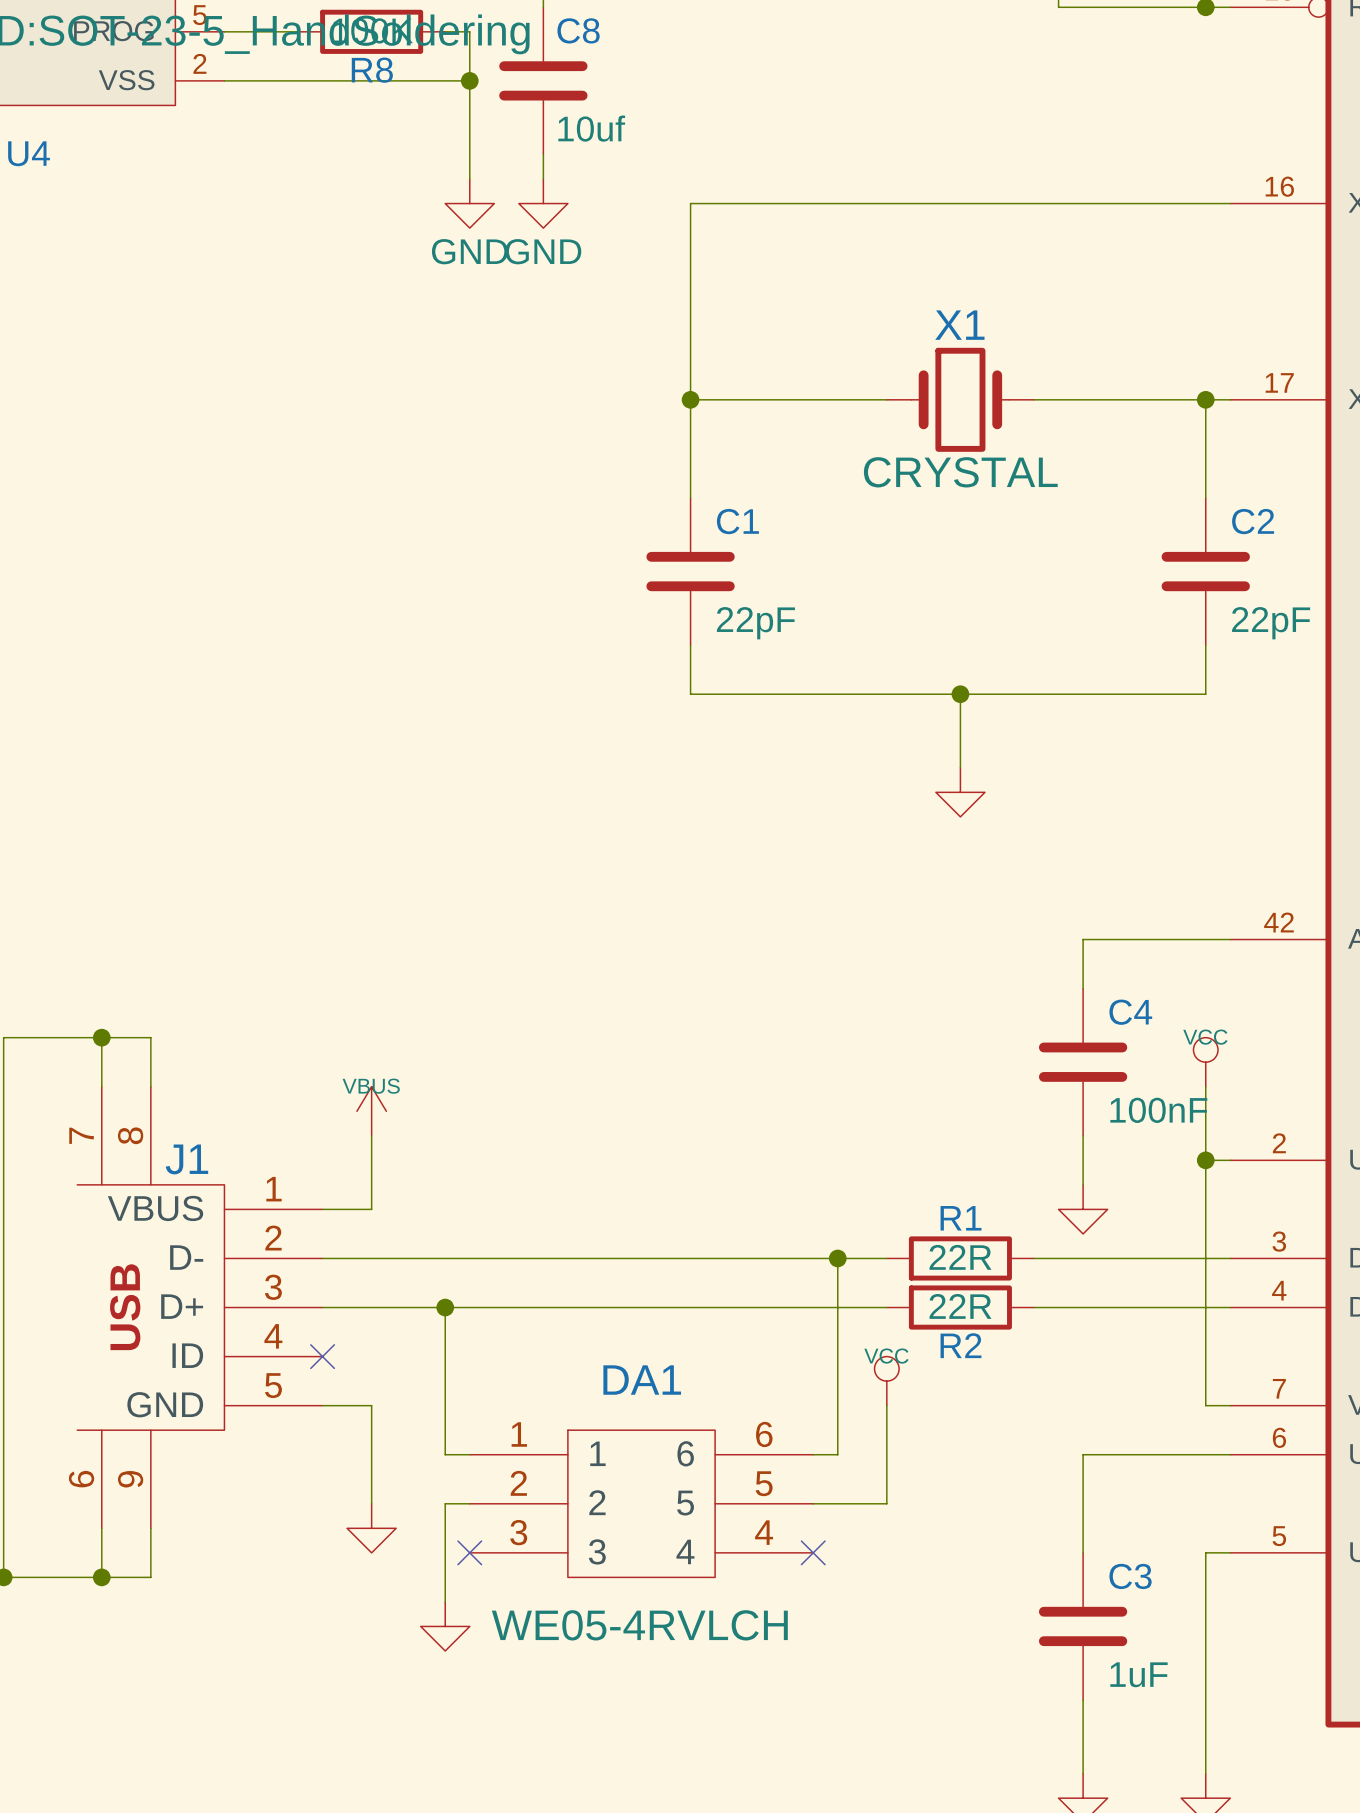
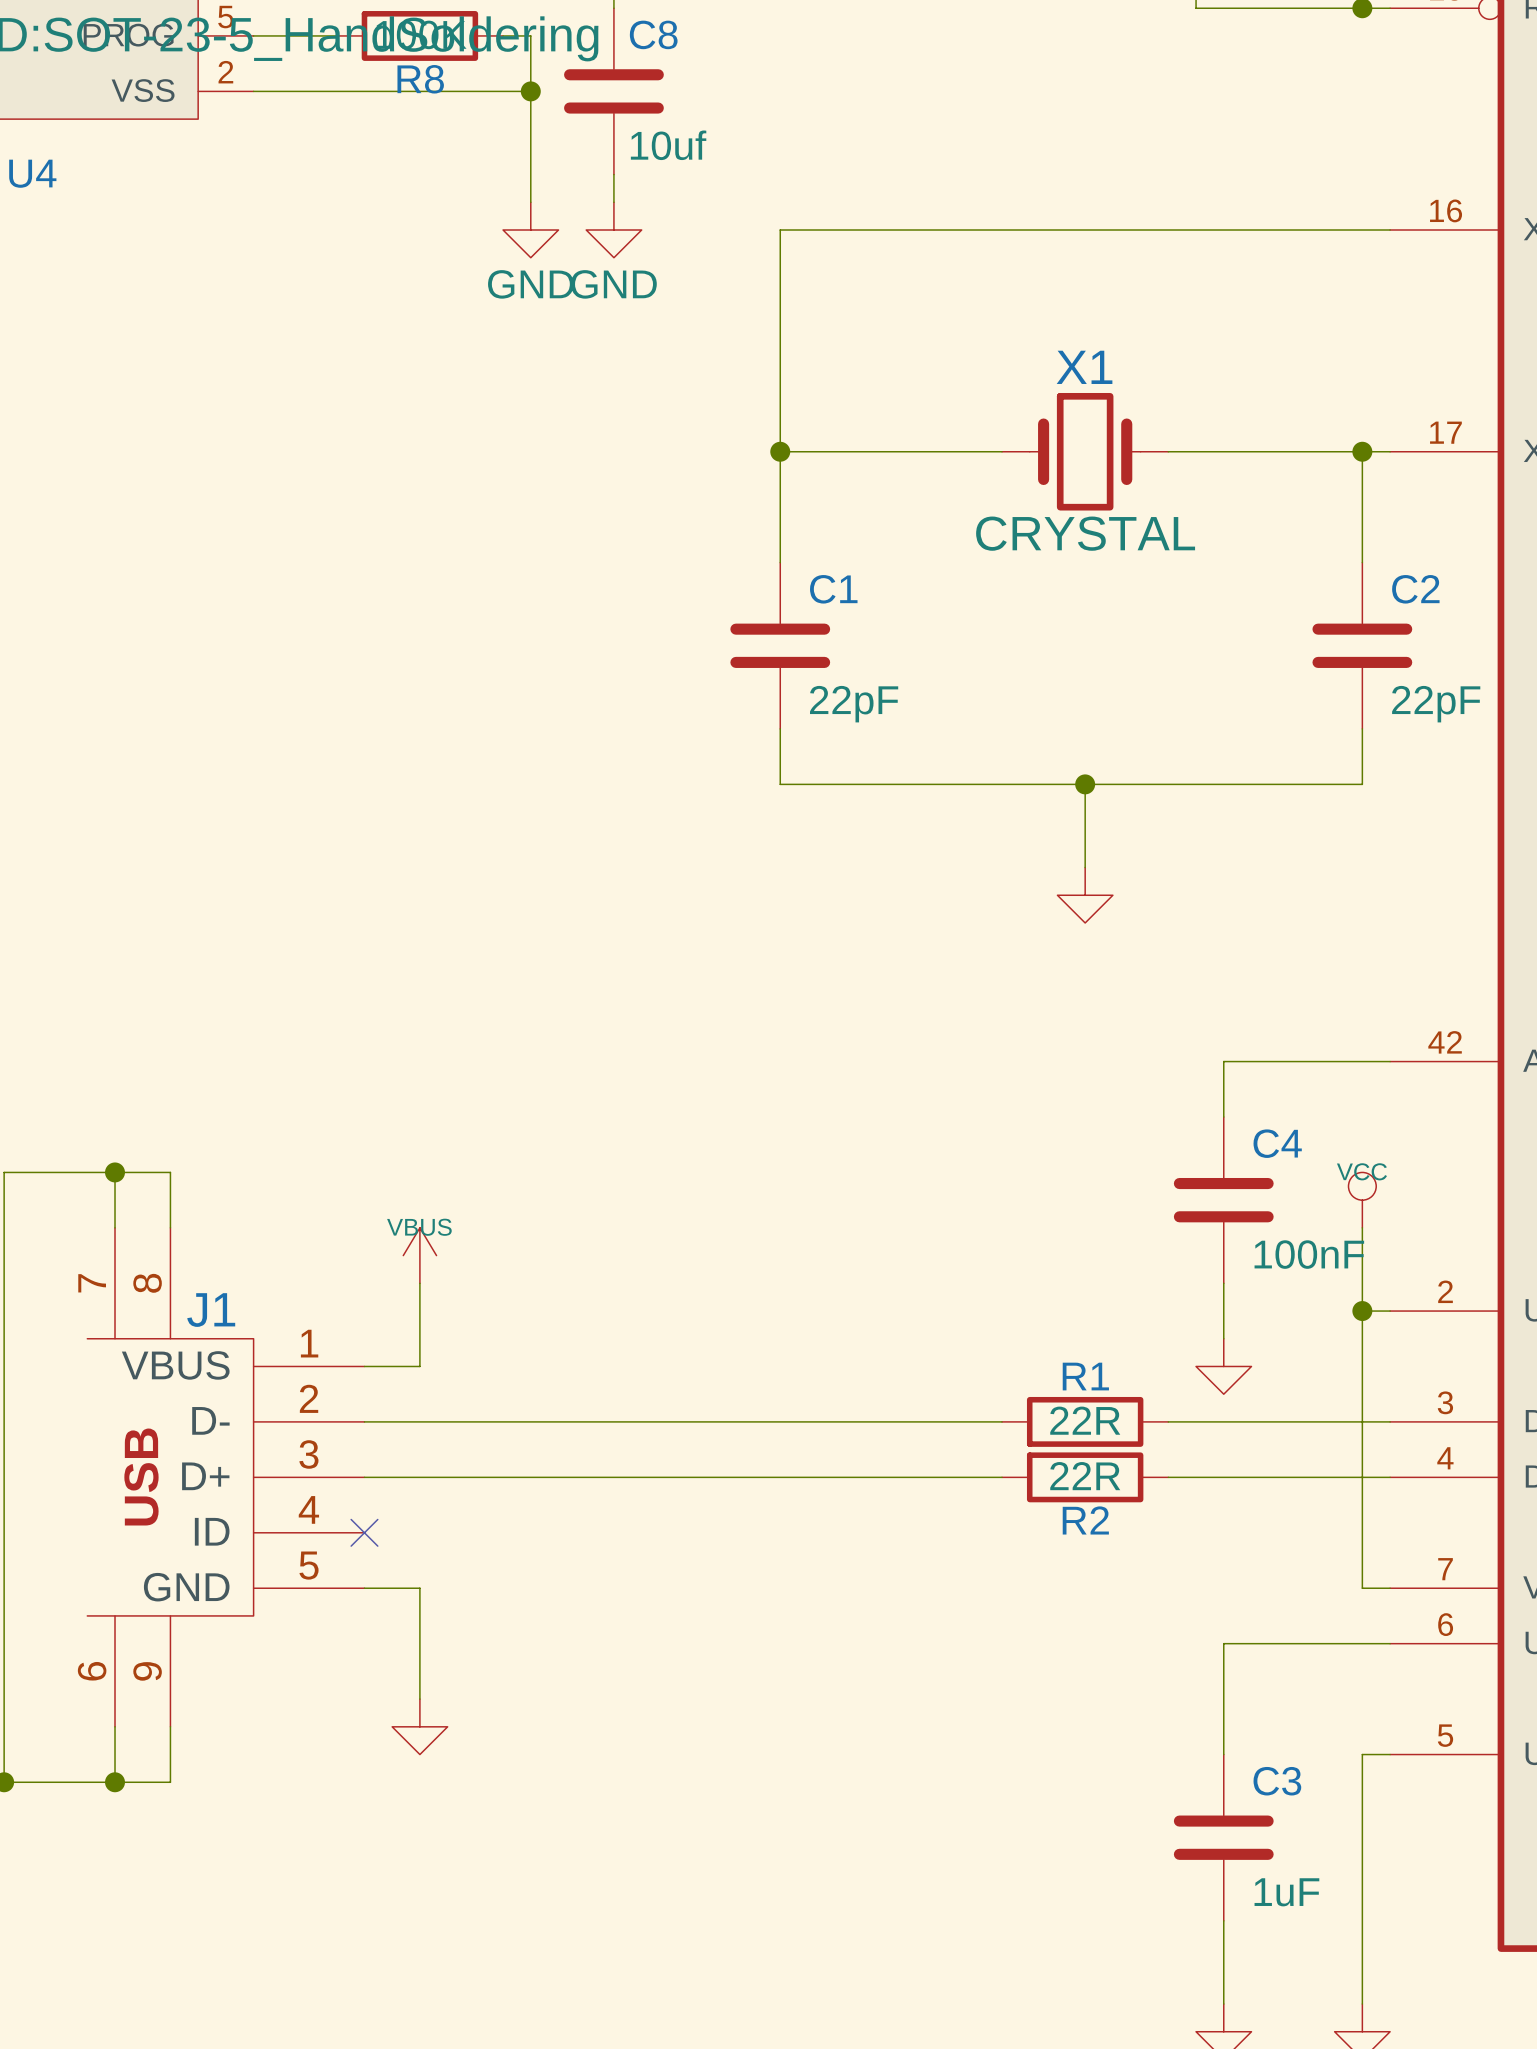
wire: (837, 1258) (837, 1454) (813, 1454) -> none
junction: (837, 1258) -> none
wire: (445, 1307) (445, 1454) (469, 1454) -> none
junction: (445, 1307) -> none
power symbol: VCC (886, 1381) -> none
wire: (886, 1405) (886, 1503) (813, 1503) -> none
wire: (469, 1503) (445, 1503) (445, 1601) -> none
DA1: WE05-4RVLCH (641, 1503) -> none
no-connect mark: (469, 1552) -> none
no-connect mark: (813, 1552) -> none
power symbol: (445, 1626) -> none

